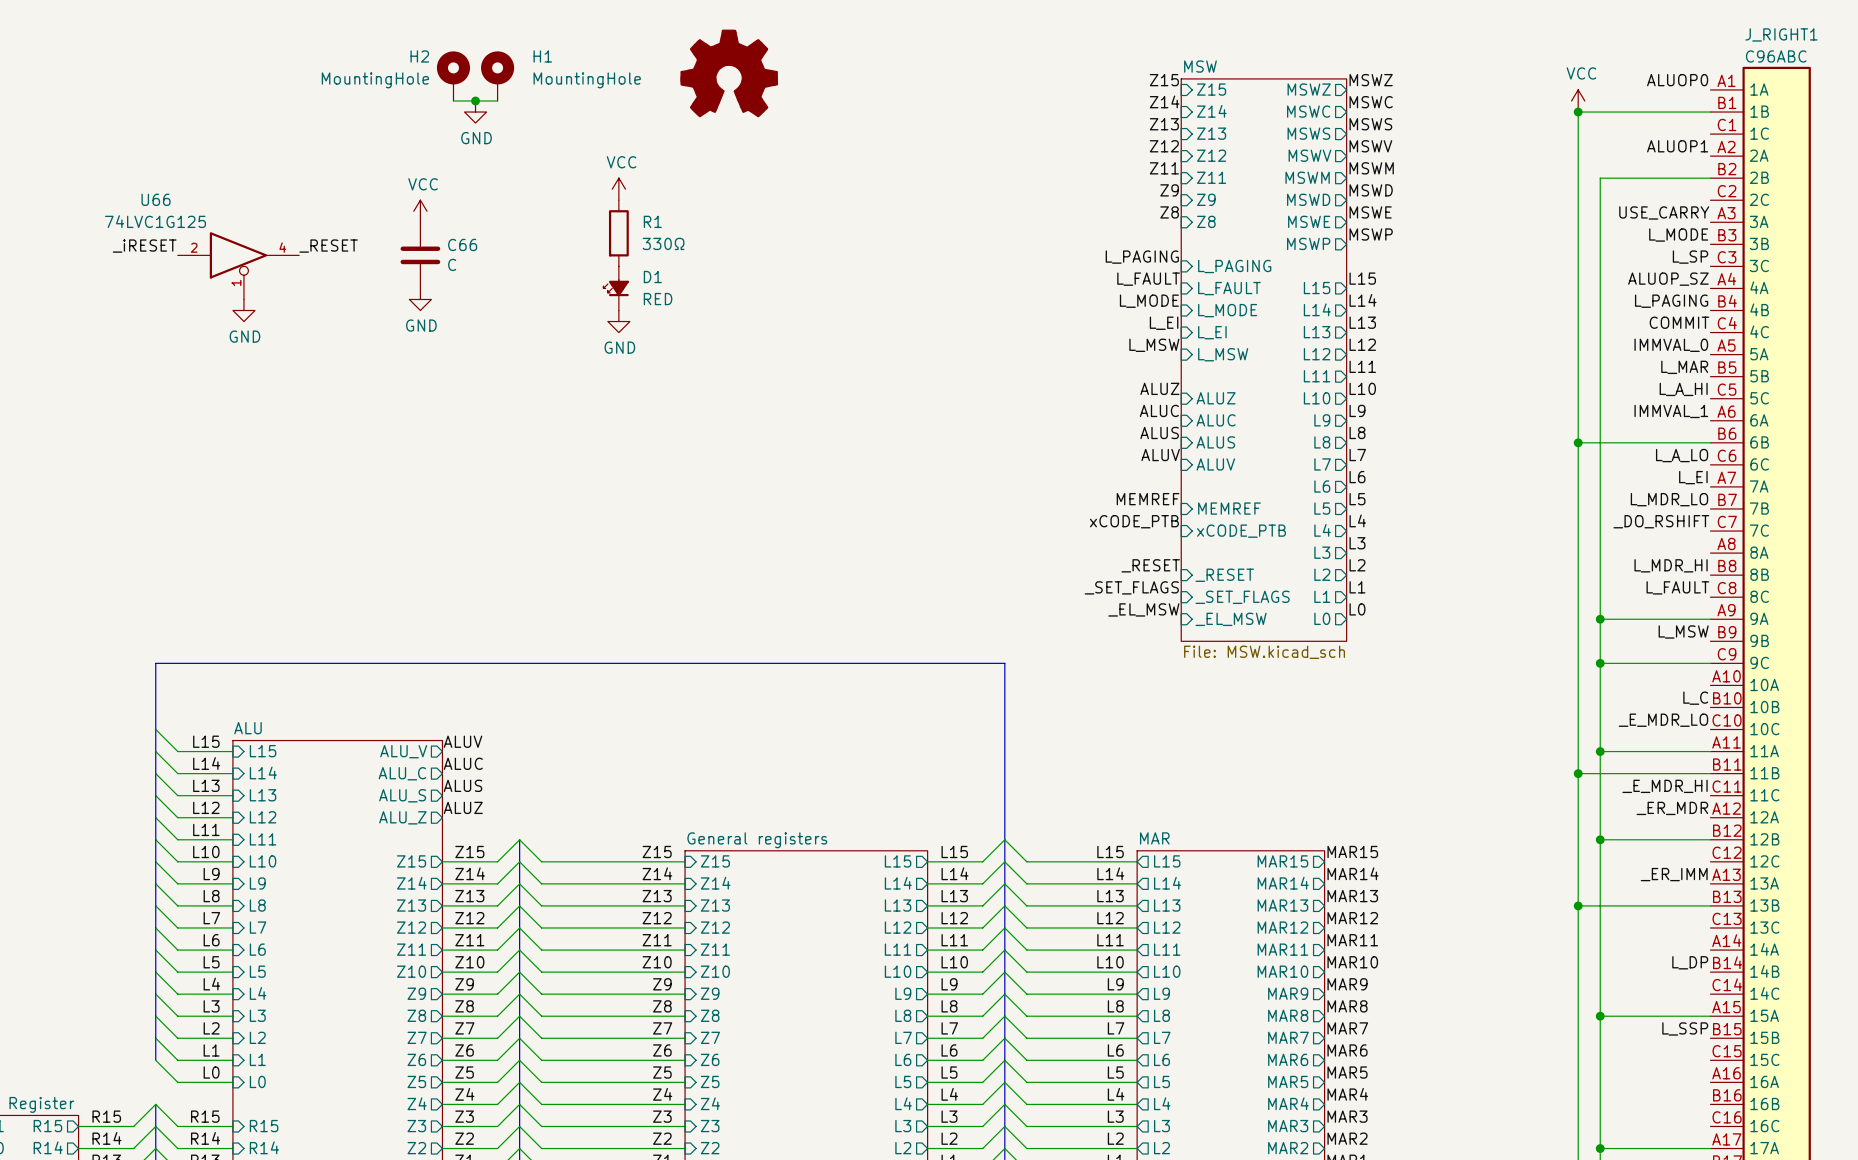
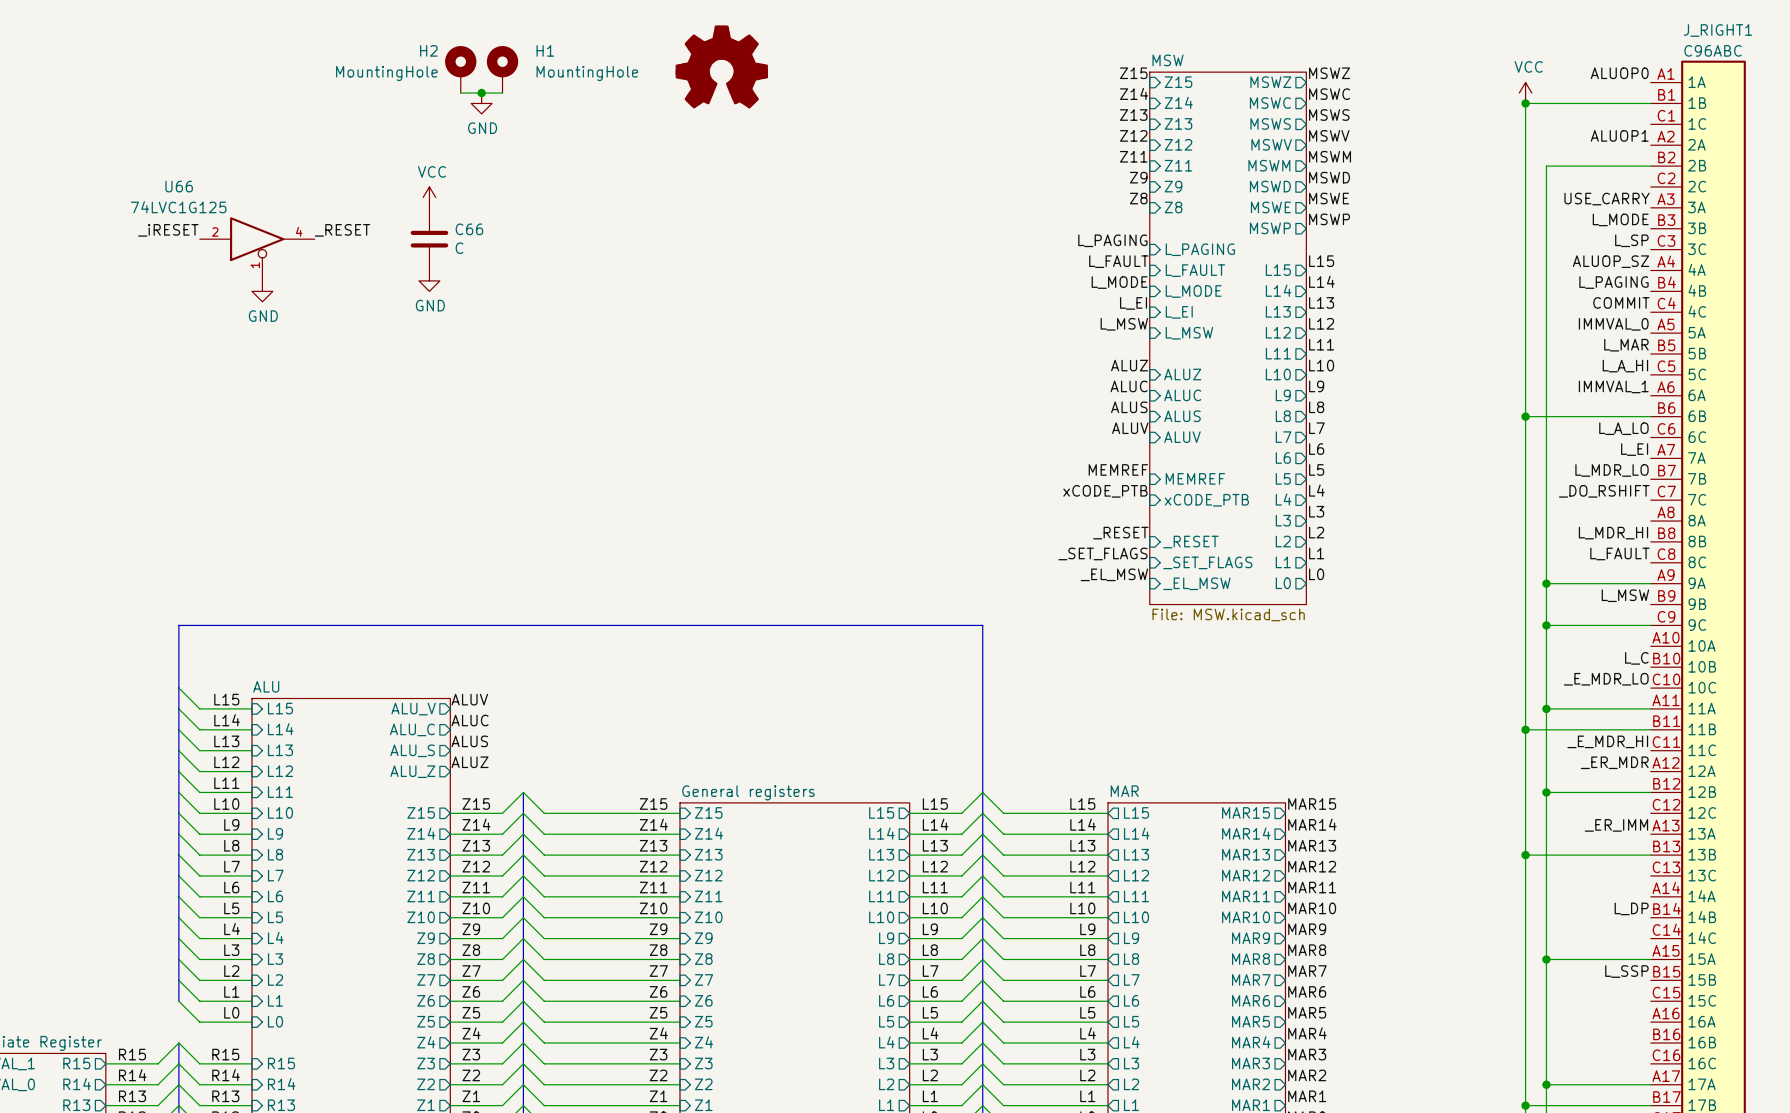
power symbol: VCC (618, 189) -> none
R1: 330Ω (618, 233) -> none
D1: RED (616, 288) -> none
power symbol: GND (618, 321) -> none

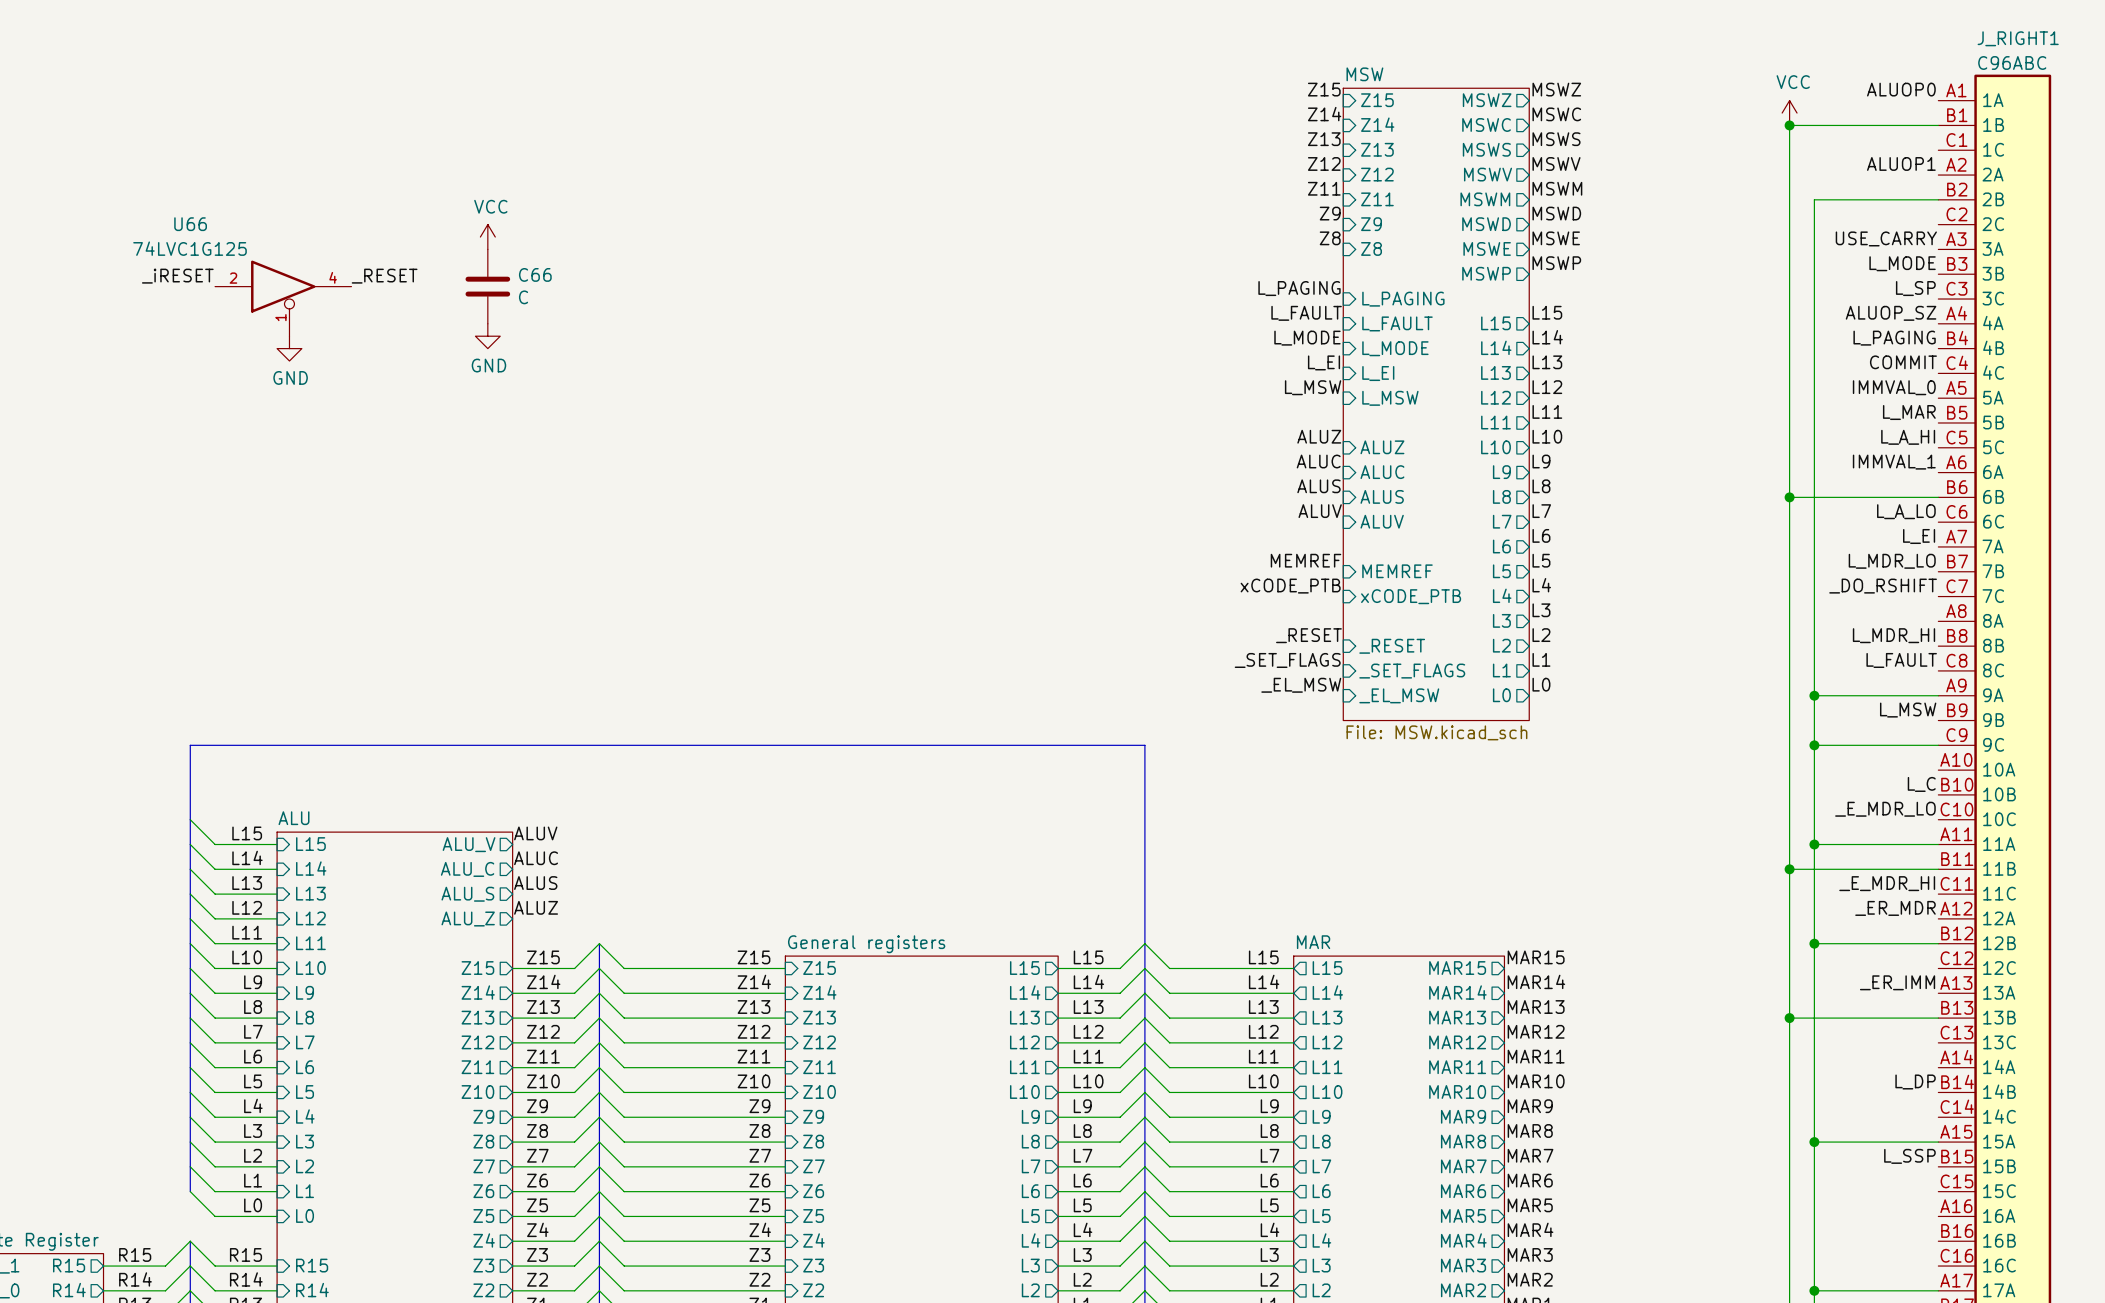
part: (721, 66) -> none
H2: MountingHole (460, 69) -> none
H1: MountingHole (502, 69) -> none
wire: (460, 93) (502, 93) -> none
junction: (481, 93) -> none
power symbol: GND (481, 103) -> none

